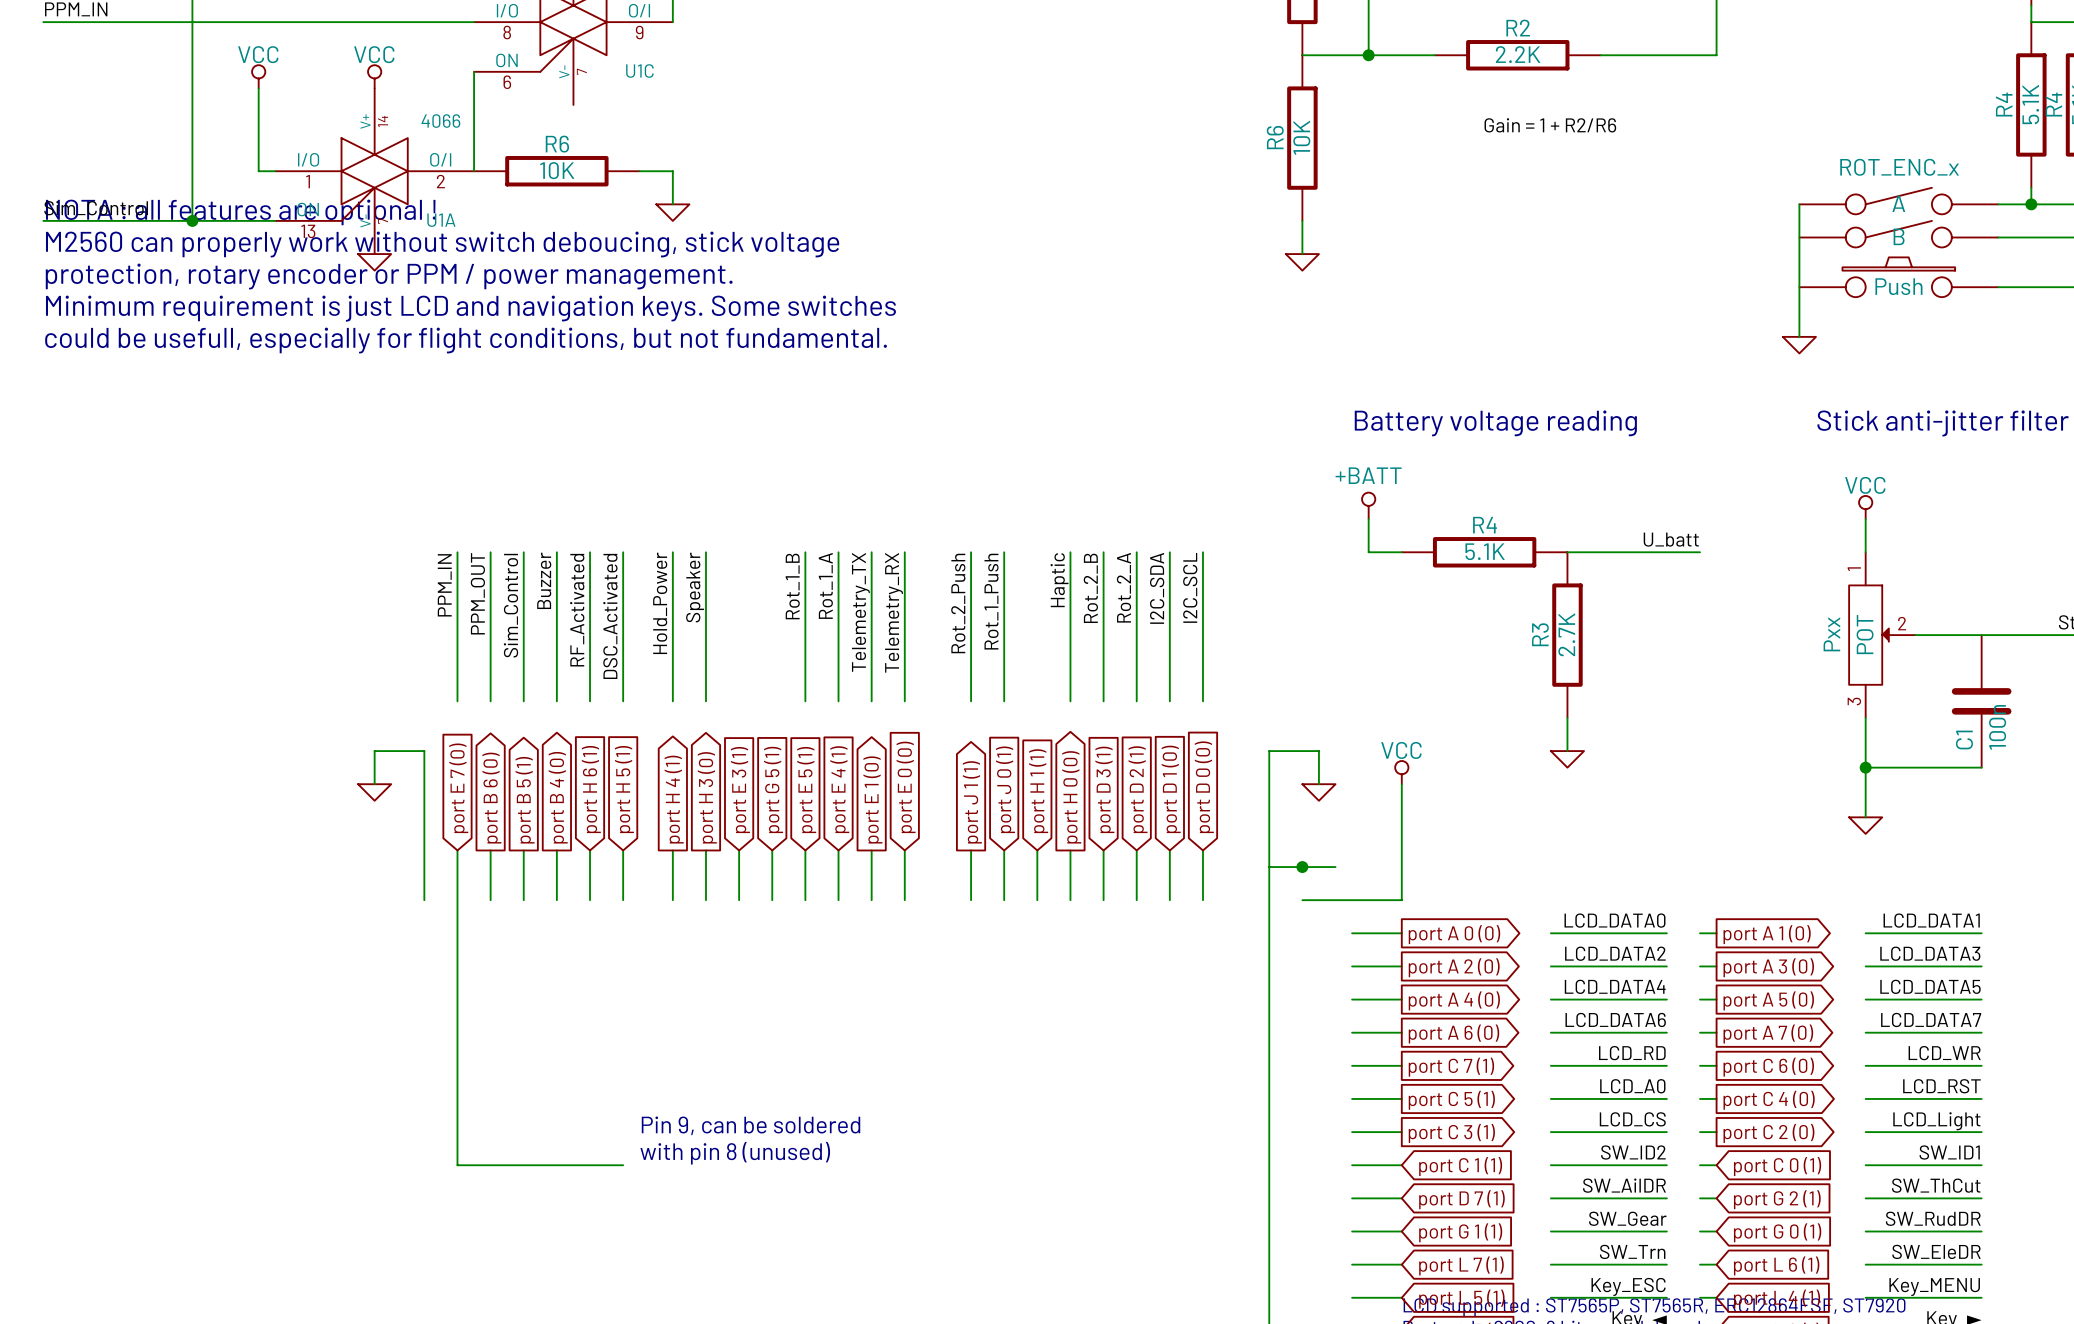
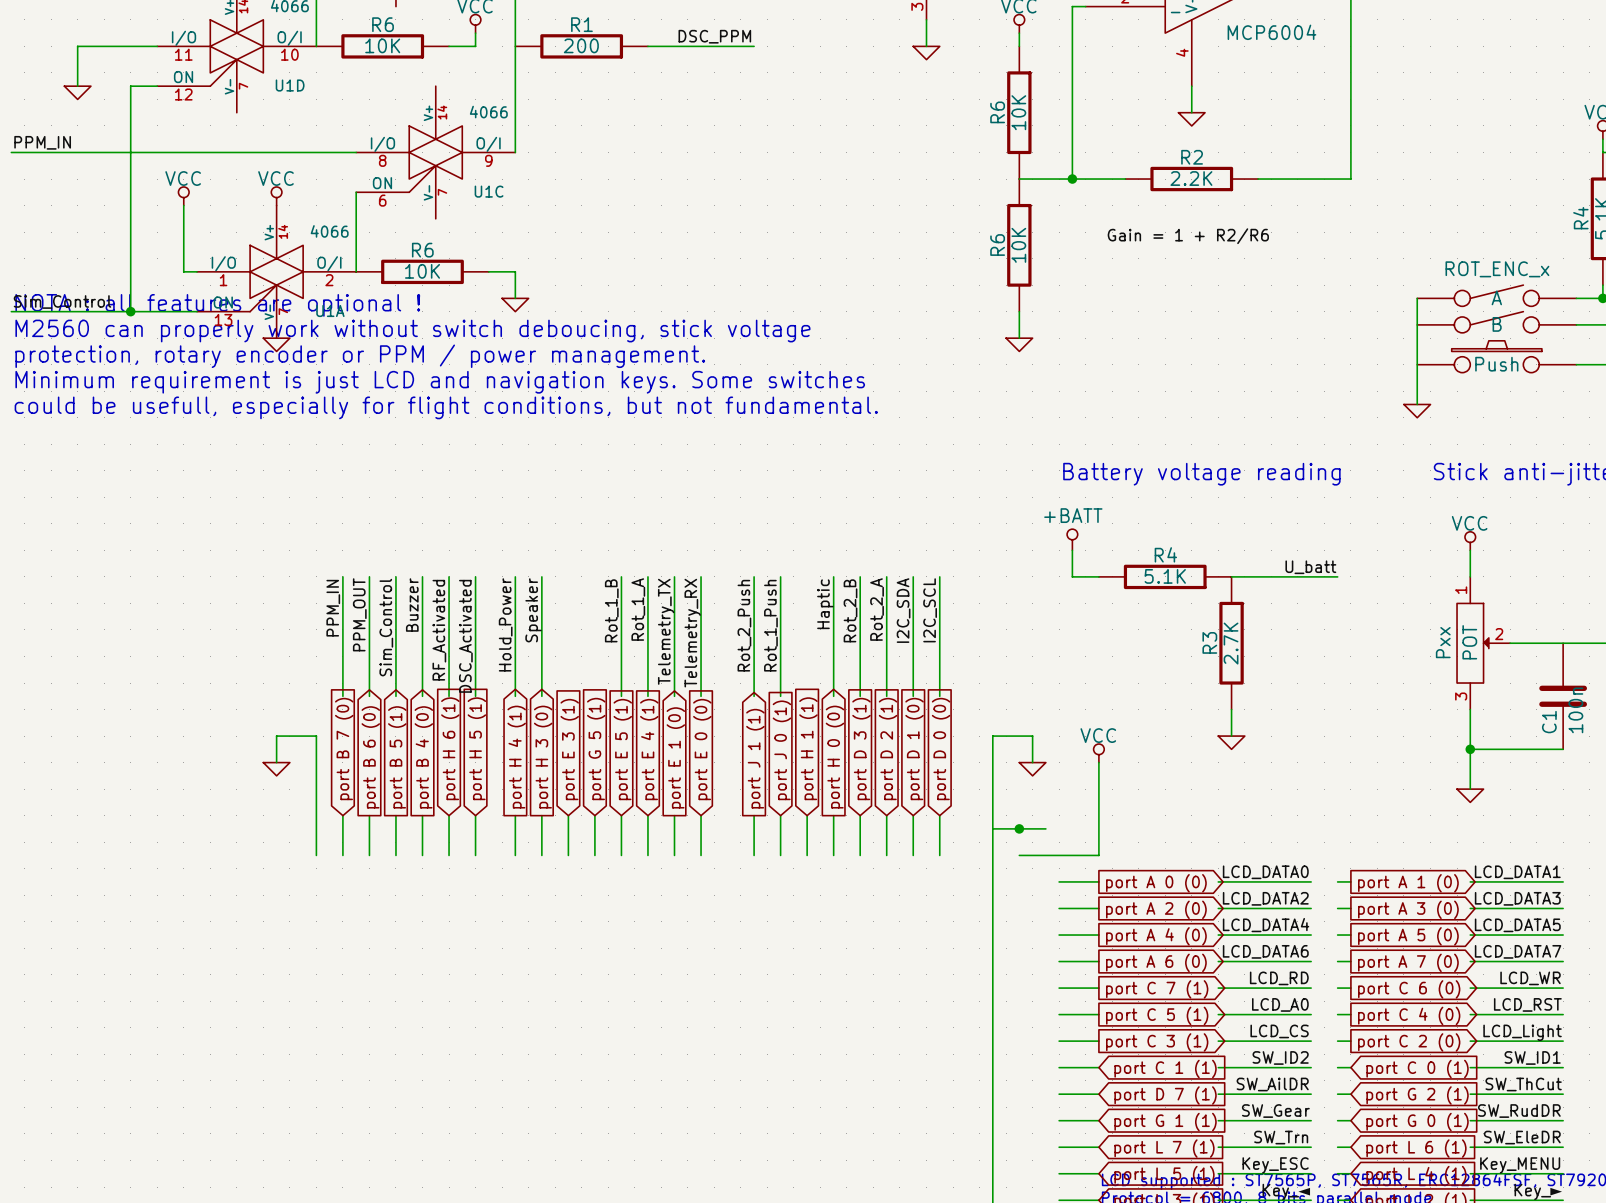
global label: port E 7 (0) (458, 788) -> port B 7 (0) (344, 749)
wire: (457, 900) (457, 1165) (623, 1165) -> none
text: Pin 9, can be soldered (751, 1125) -> none
text: with pin 8 (unused) (735, 1153) -> none

